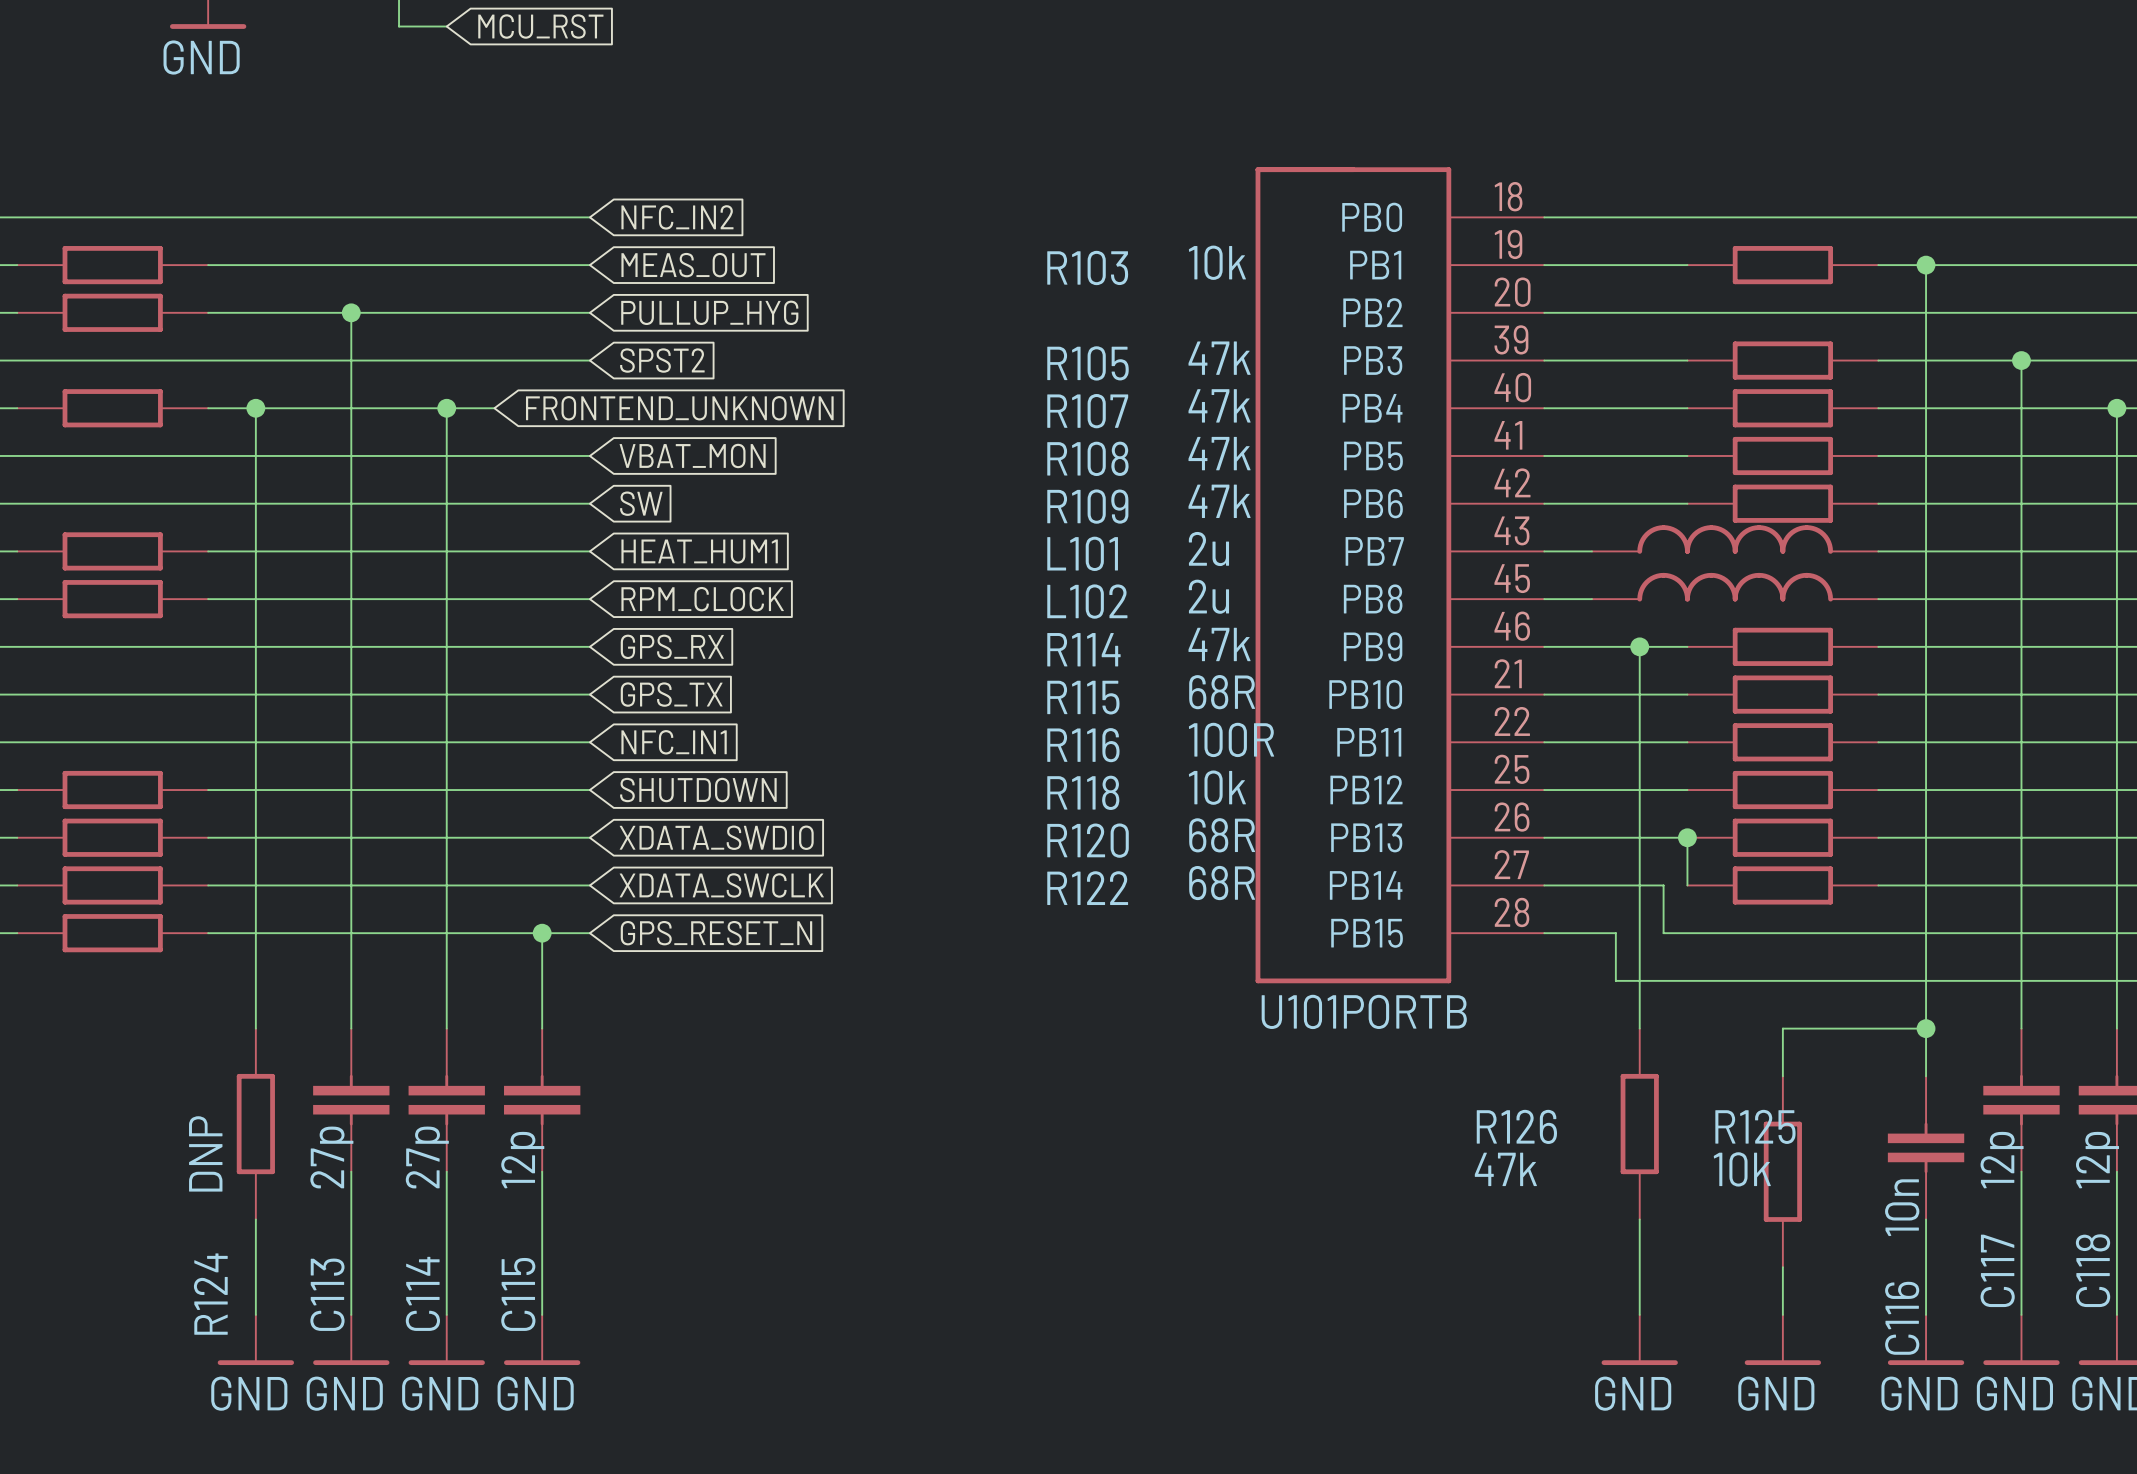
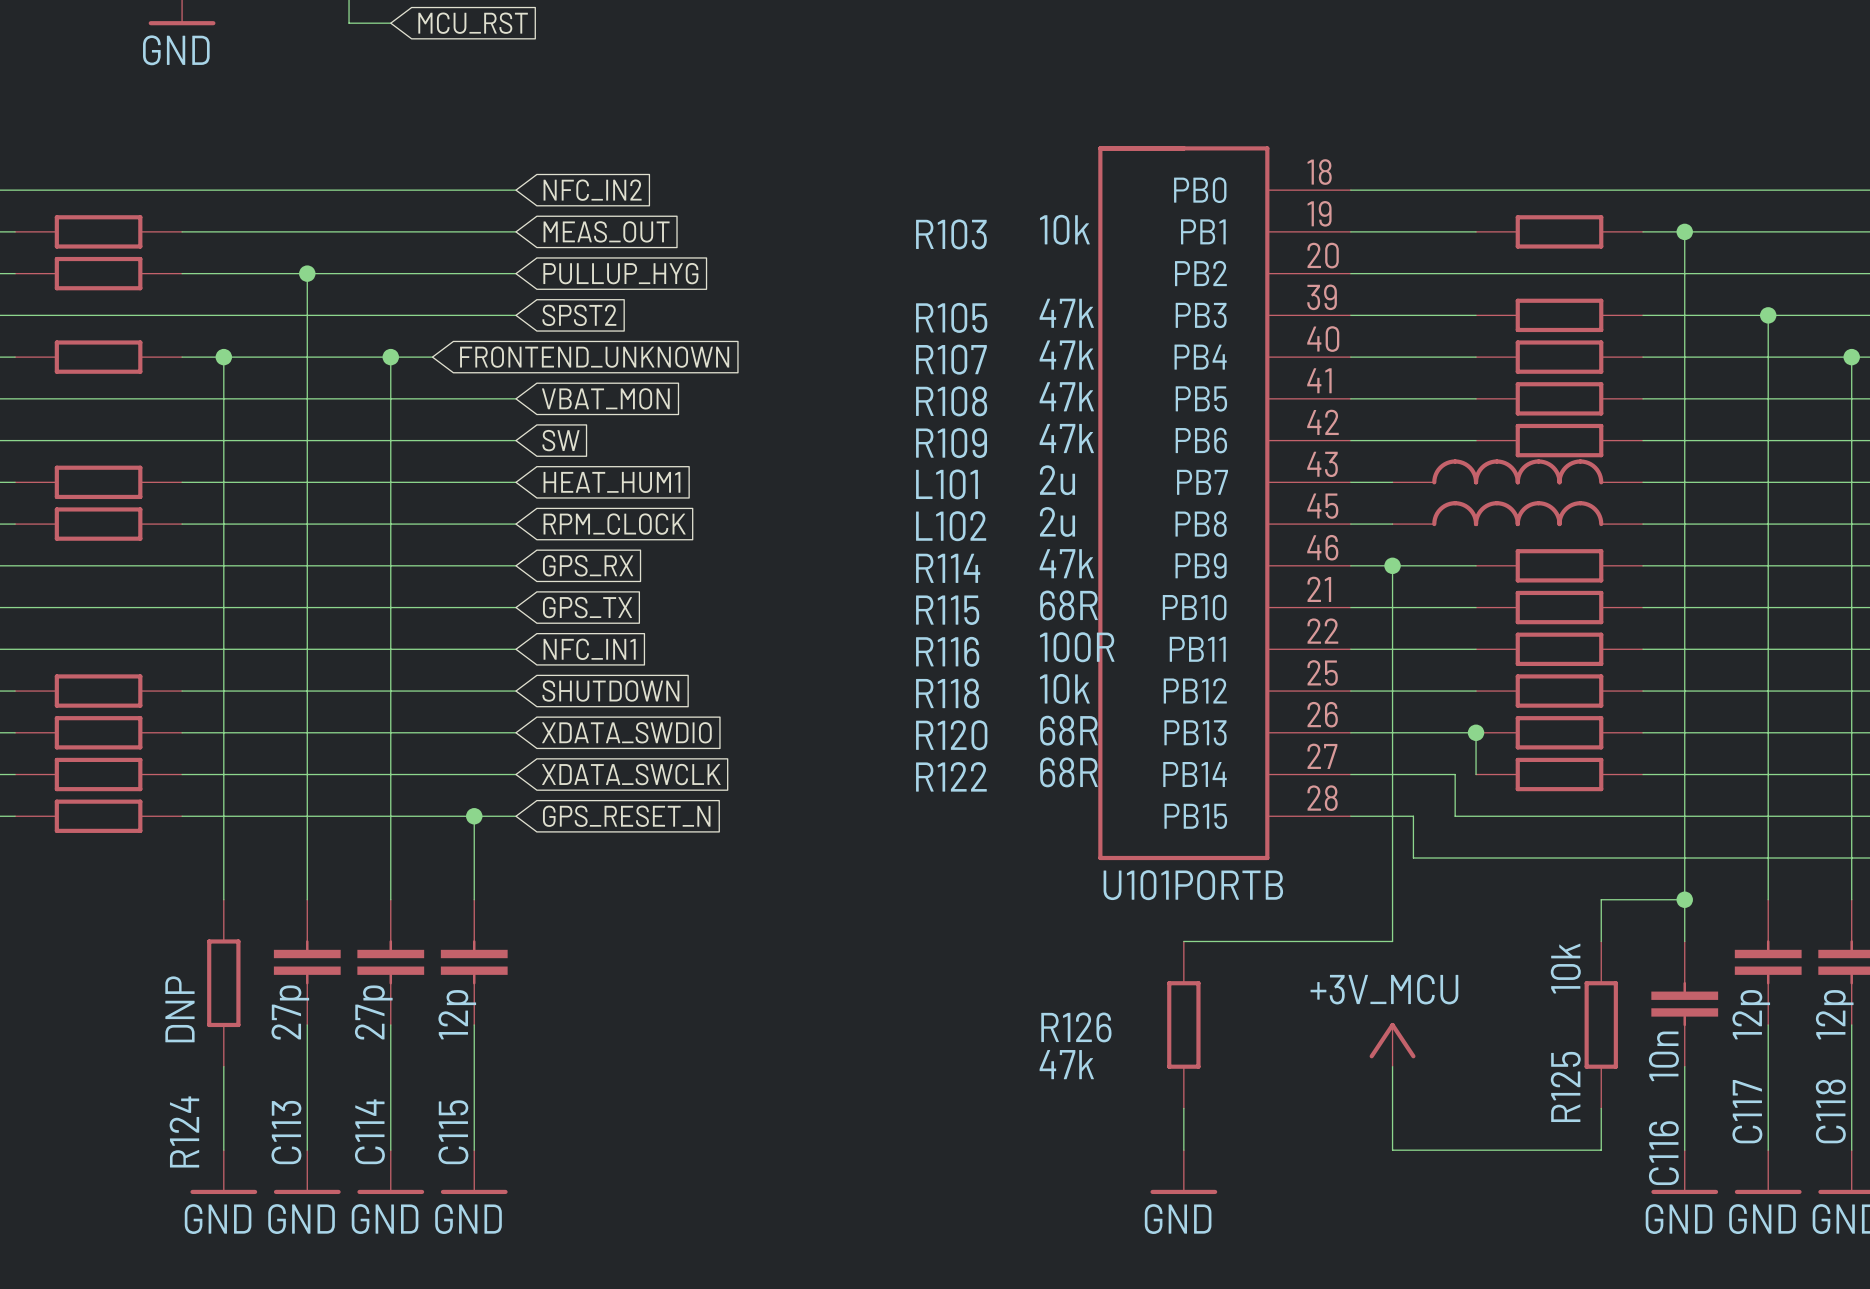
wire: none -> (1392, 565) (1392, 941) (1183, 941)
wire: (1639, 646) (1639, 1028) -> none
junction position: (1639, 646) -> (1392, 565)
wire: (1830, 1028) (1782, 1028) (1782, 1076) -> (1601, 899) (1601, 941)
R126 position: (1639, 1124) -> (1183, 1024)
R125 name rotation: 0° (1755, 1126) -> 90° counterclockwise (1565, 1086)
R125 value rotation: 0° (1742, 1169) -> 90° counterclockwise (1565, 968)
R125 position: (1782, 1171) -> (1601, 1024)
power symbol: none -> +3V_MCU (1392, 1044)
wire: none -> (1392, 1066) (1392, 1150) (1601, 1150) (1601, 1108)
wire: (1639, 1219) (1639, 1314) -> none
wire: (1782, 1267) (1782, 1314) -> (1183, 1108) (1183, 1150)
power symbol: none -> GND (1183, 1172)
power symbol: GND (1639, 1339) -> none
power symbol: GND (1782, 1339) -> none

